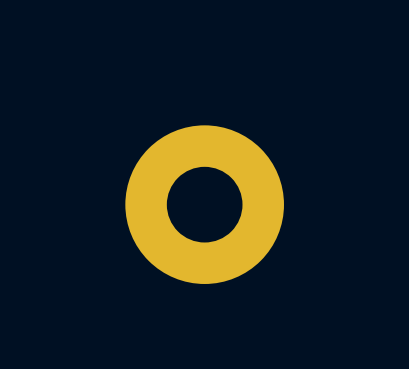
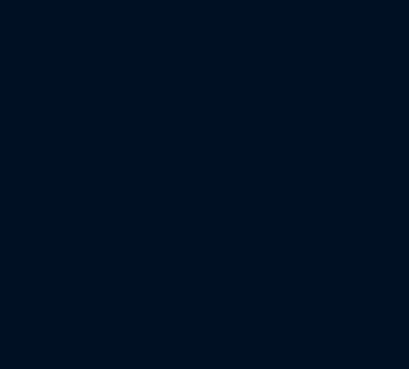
part: (204, 204) -> none

